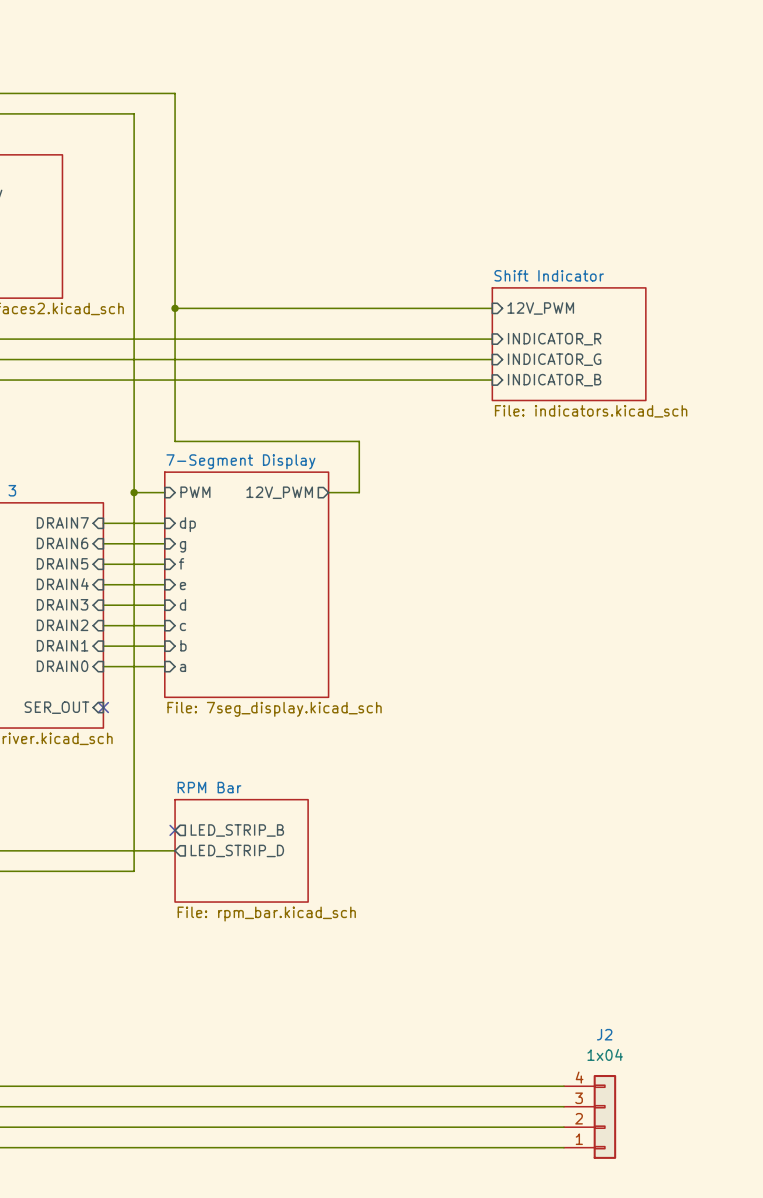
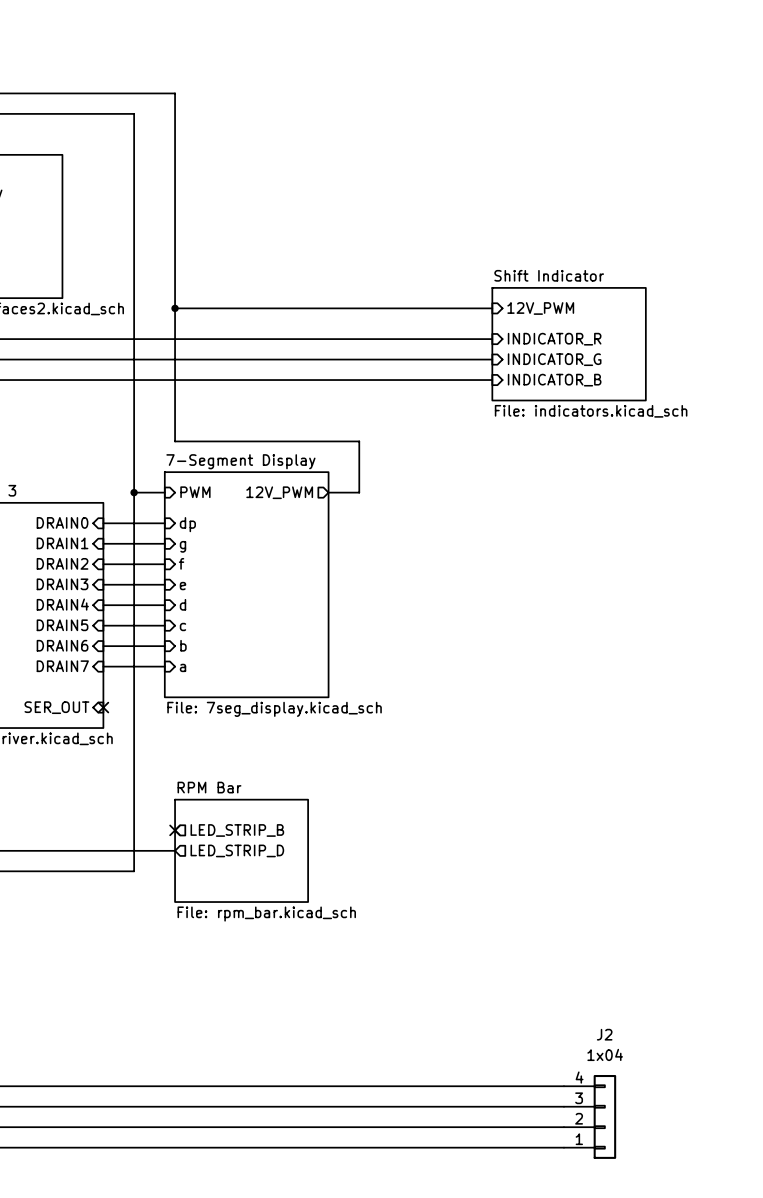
sheet pin: DRAIN7 (62, 522) -> DRAIN0 (62, 522)
sheet pin: DRAIN6 (62, 543) -> DRAIN1 (62, 543)
sheet pin: DRAIN5 (62, 563) -> DRAIN2 (62, 563)
sheet pin: DRAIN4 (62, 584) -> DRAIN3 (62, 584)
sheet pin: DRAIN3 (62, 604) -> DRAIN4 (62, 604)
sheet pin: DRAIN2 (62, 625) -> DRAIN5 (62, 625)
sheet pin: DRAIN1 (62, 645) -> DRAIN6 (62, 645)
sheet pin: DRAIN0 (62, 666) -> DRAIN7 (62, 666)

